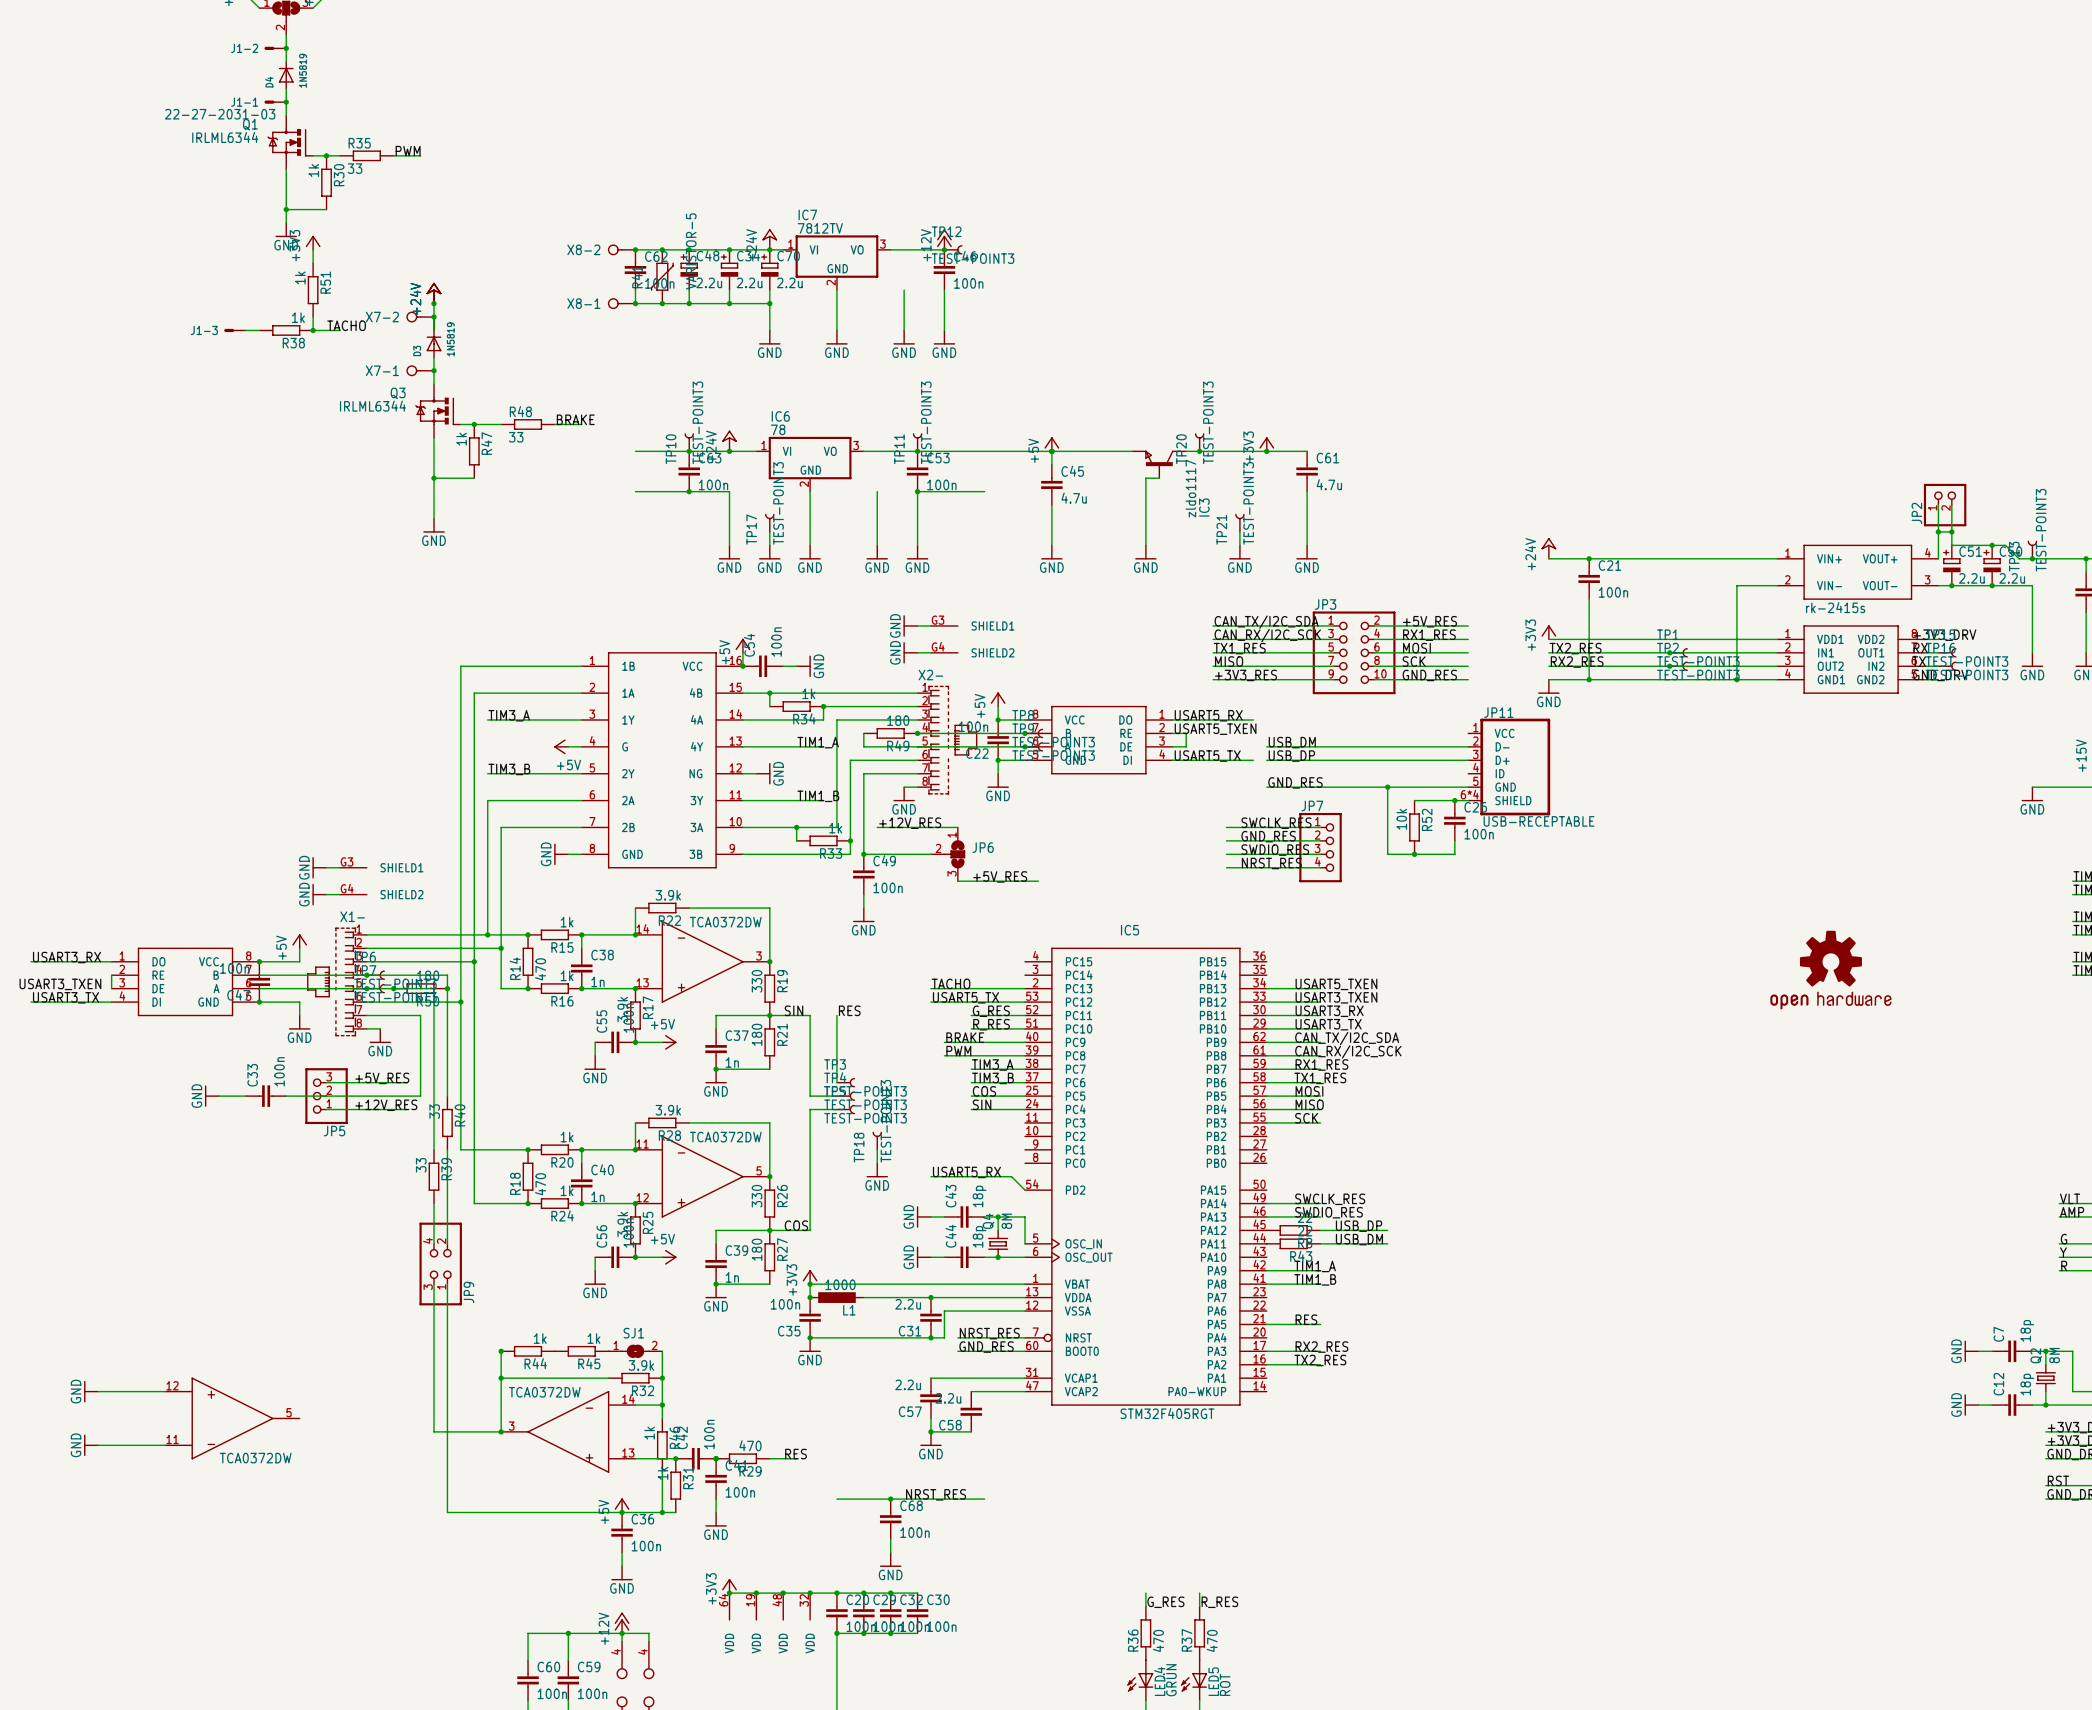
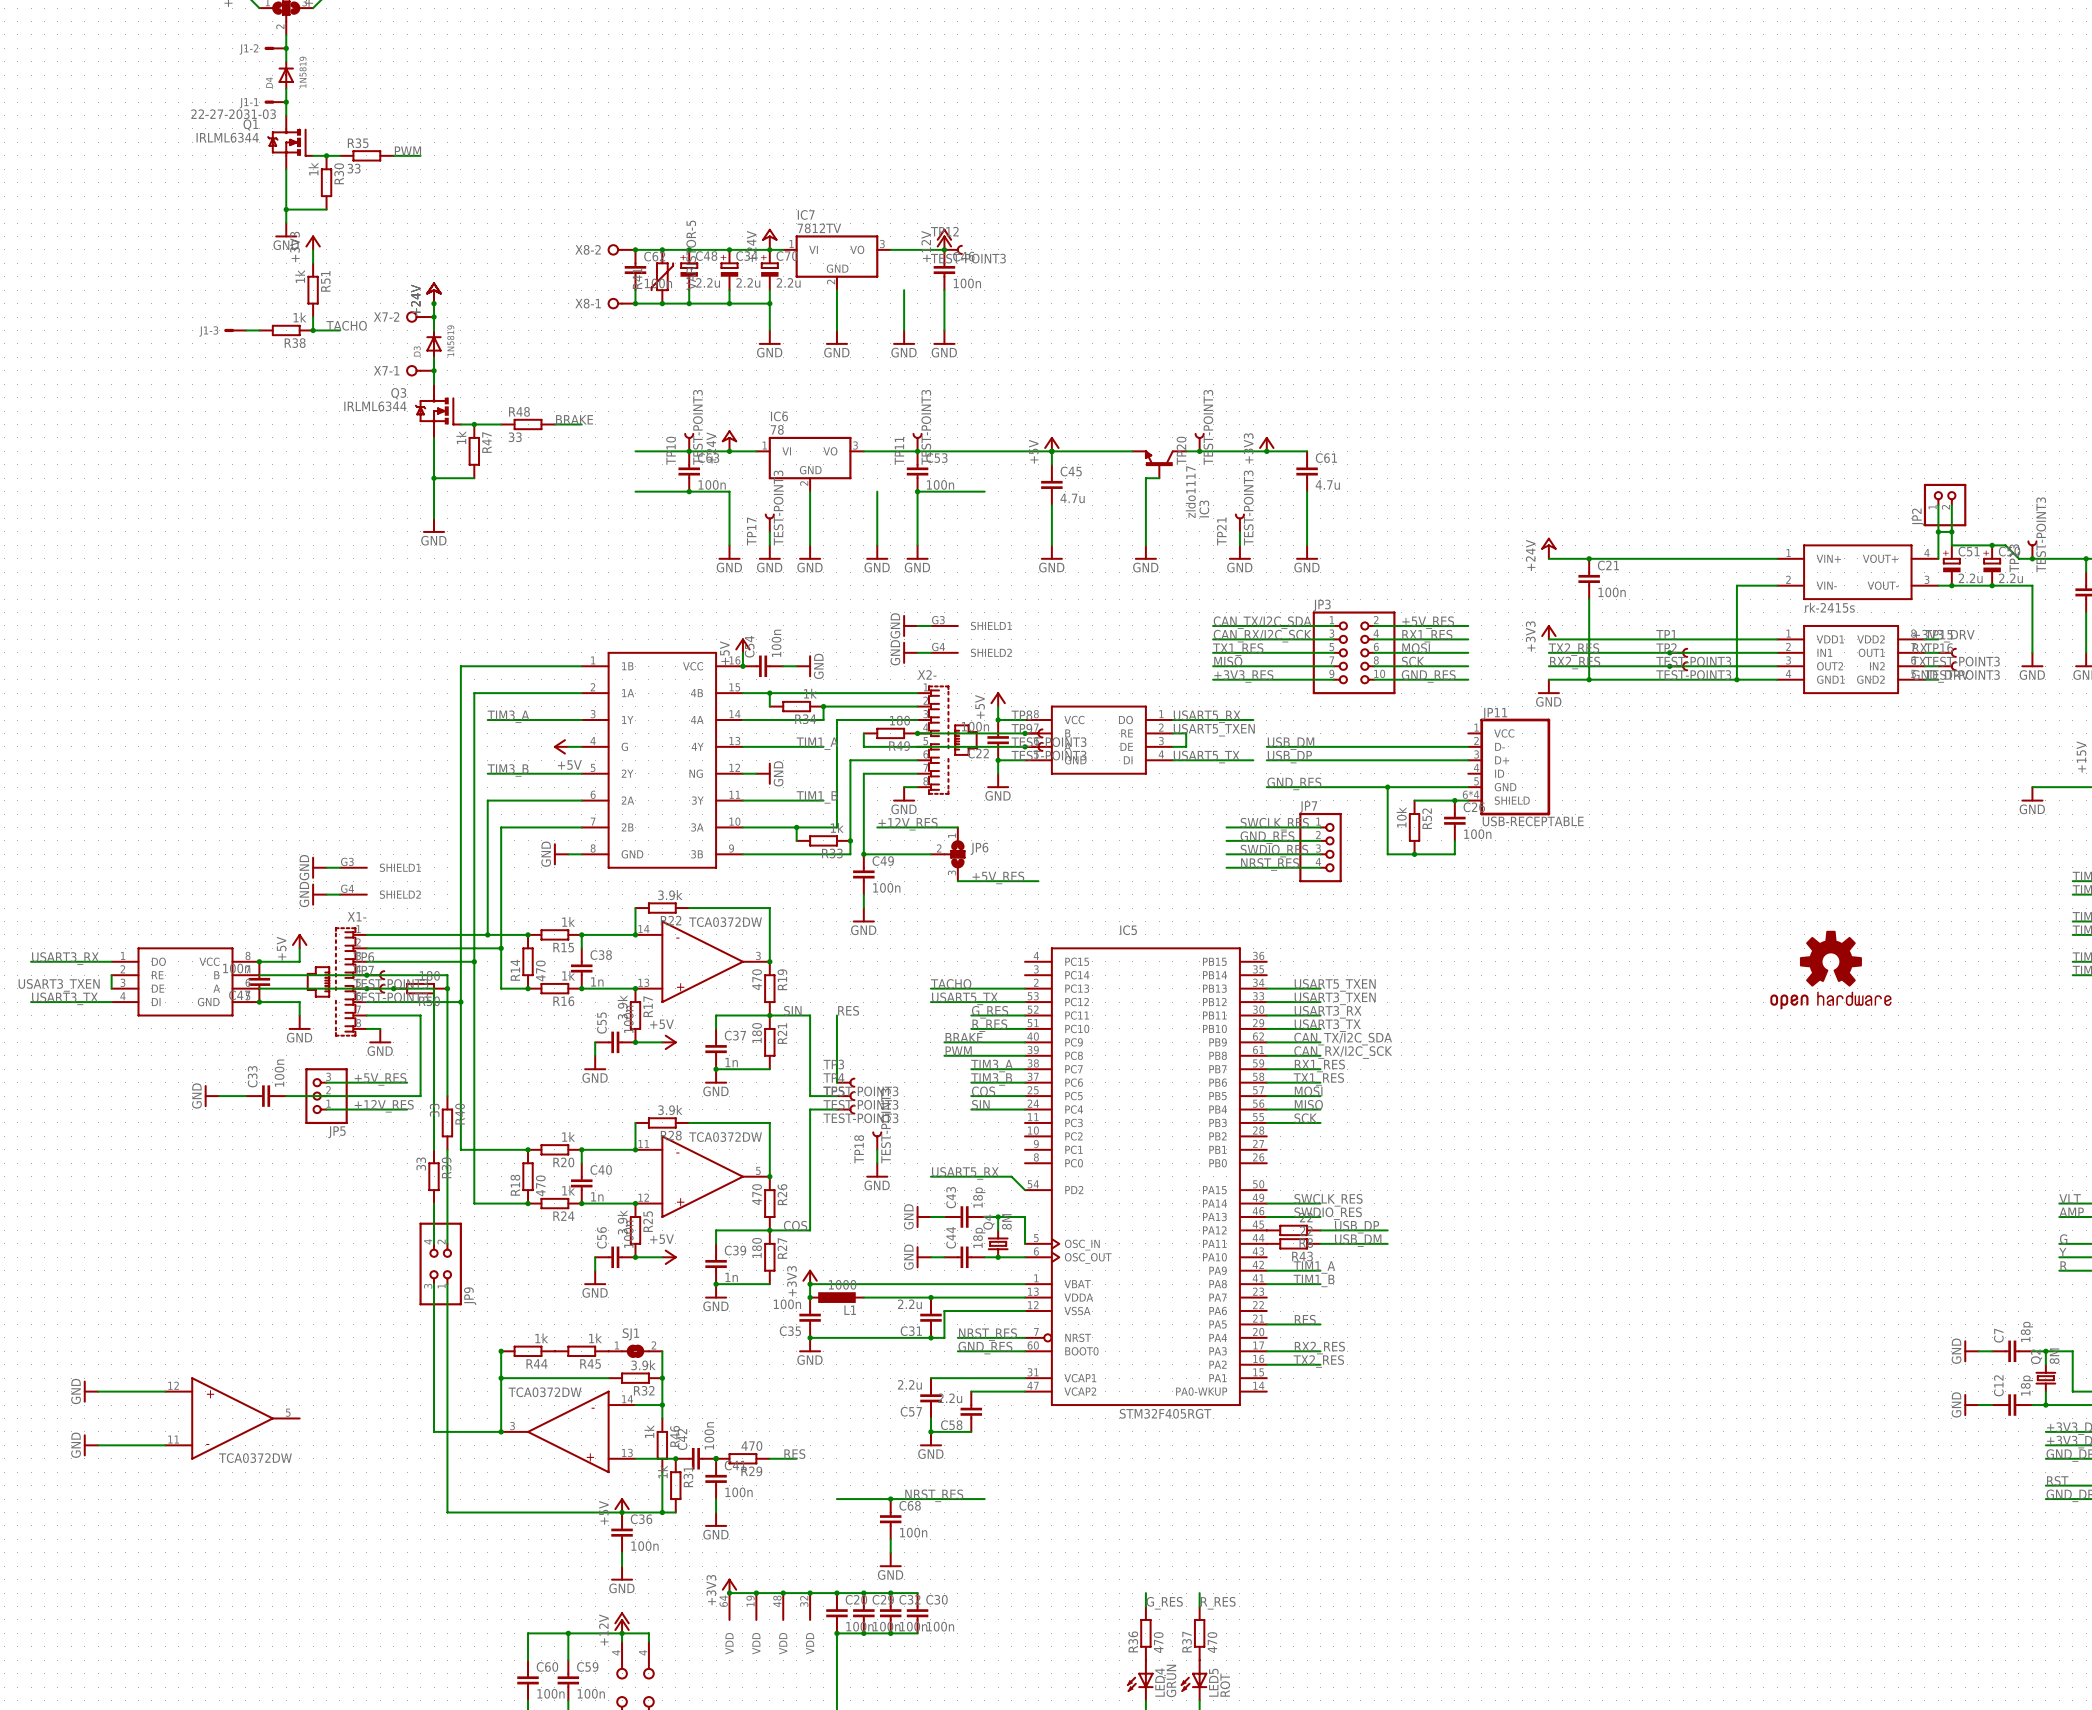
R19 value: 330 (757, 981) -> 470 (757, 979)
R26 value: 330 (757, 1196) -> 470 (757, 1194)

